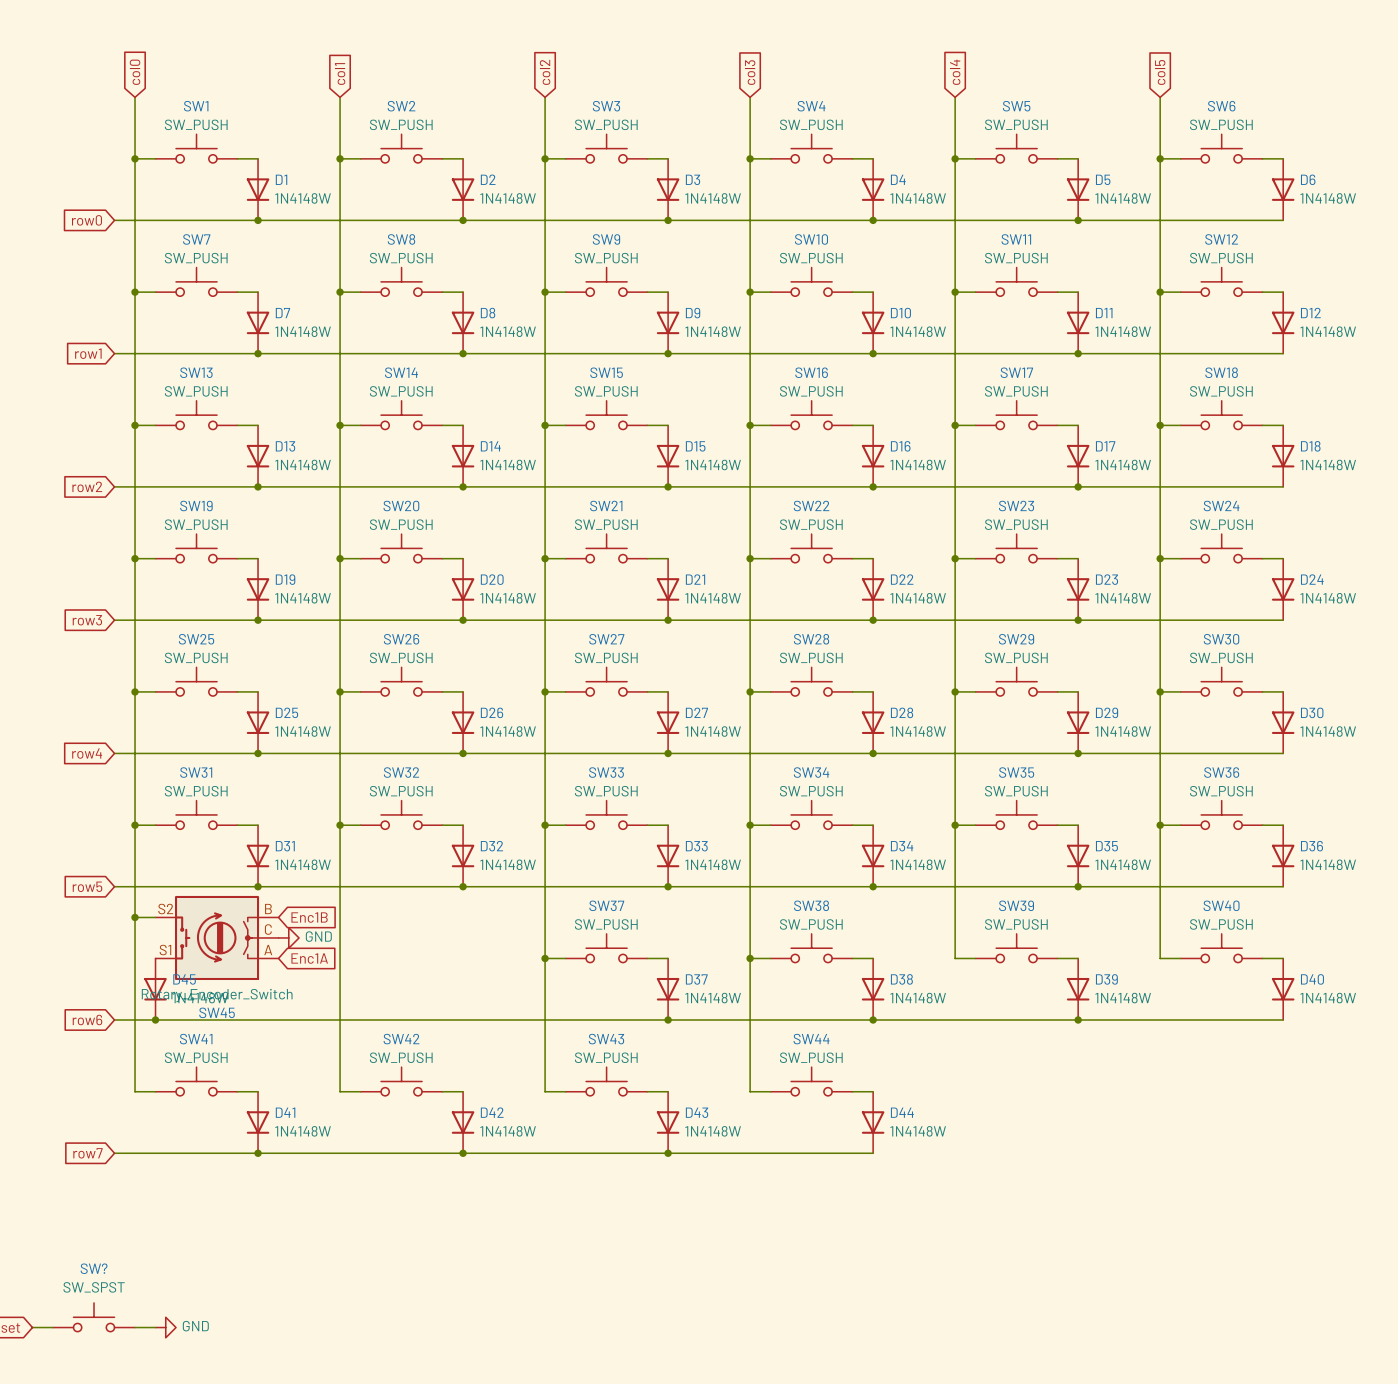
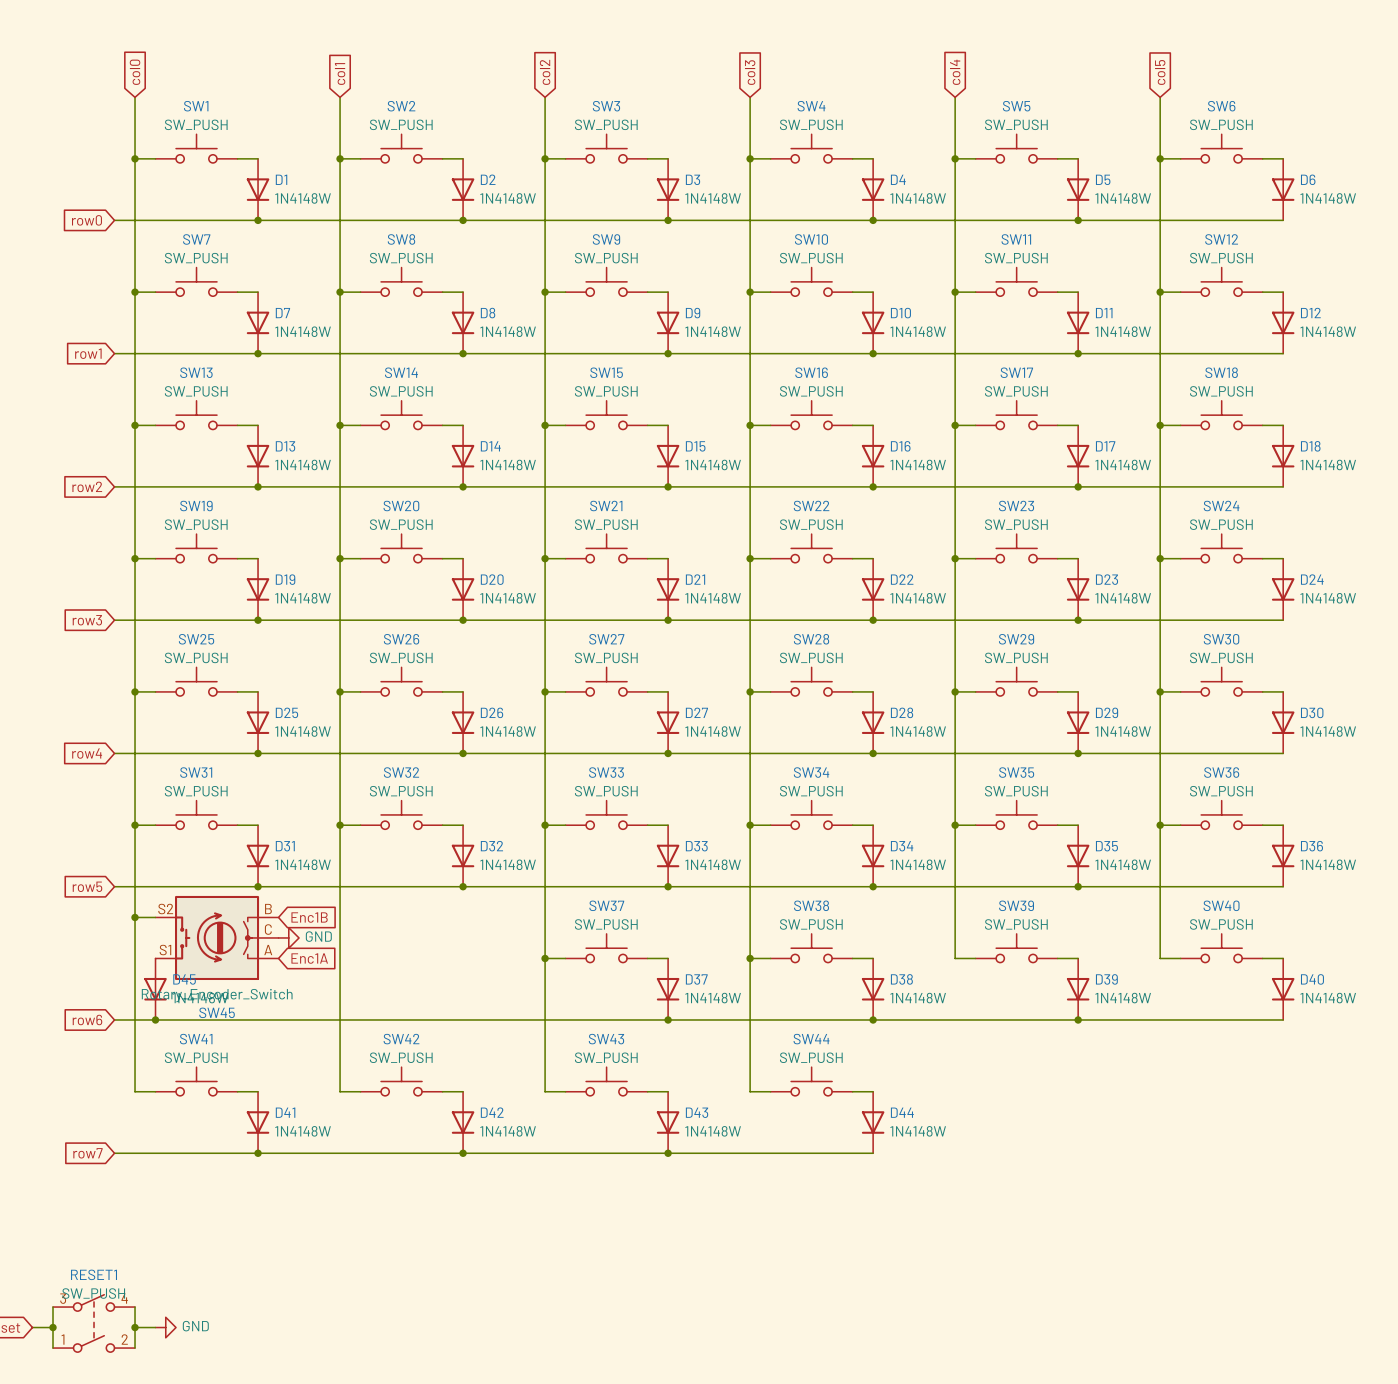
wire: none -> (53, 1307) (53, 1348)
wire: none -> (135, 1307) (135, 1348)
SW?: SW_SPST (94, 1317) -> none
RESET1: none -> SW_PUSH (94, 1323)
junction: none -> (53, 1327)
junction: none -> (135, 1327)

